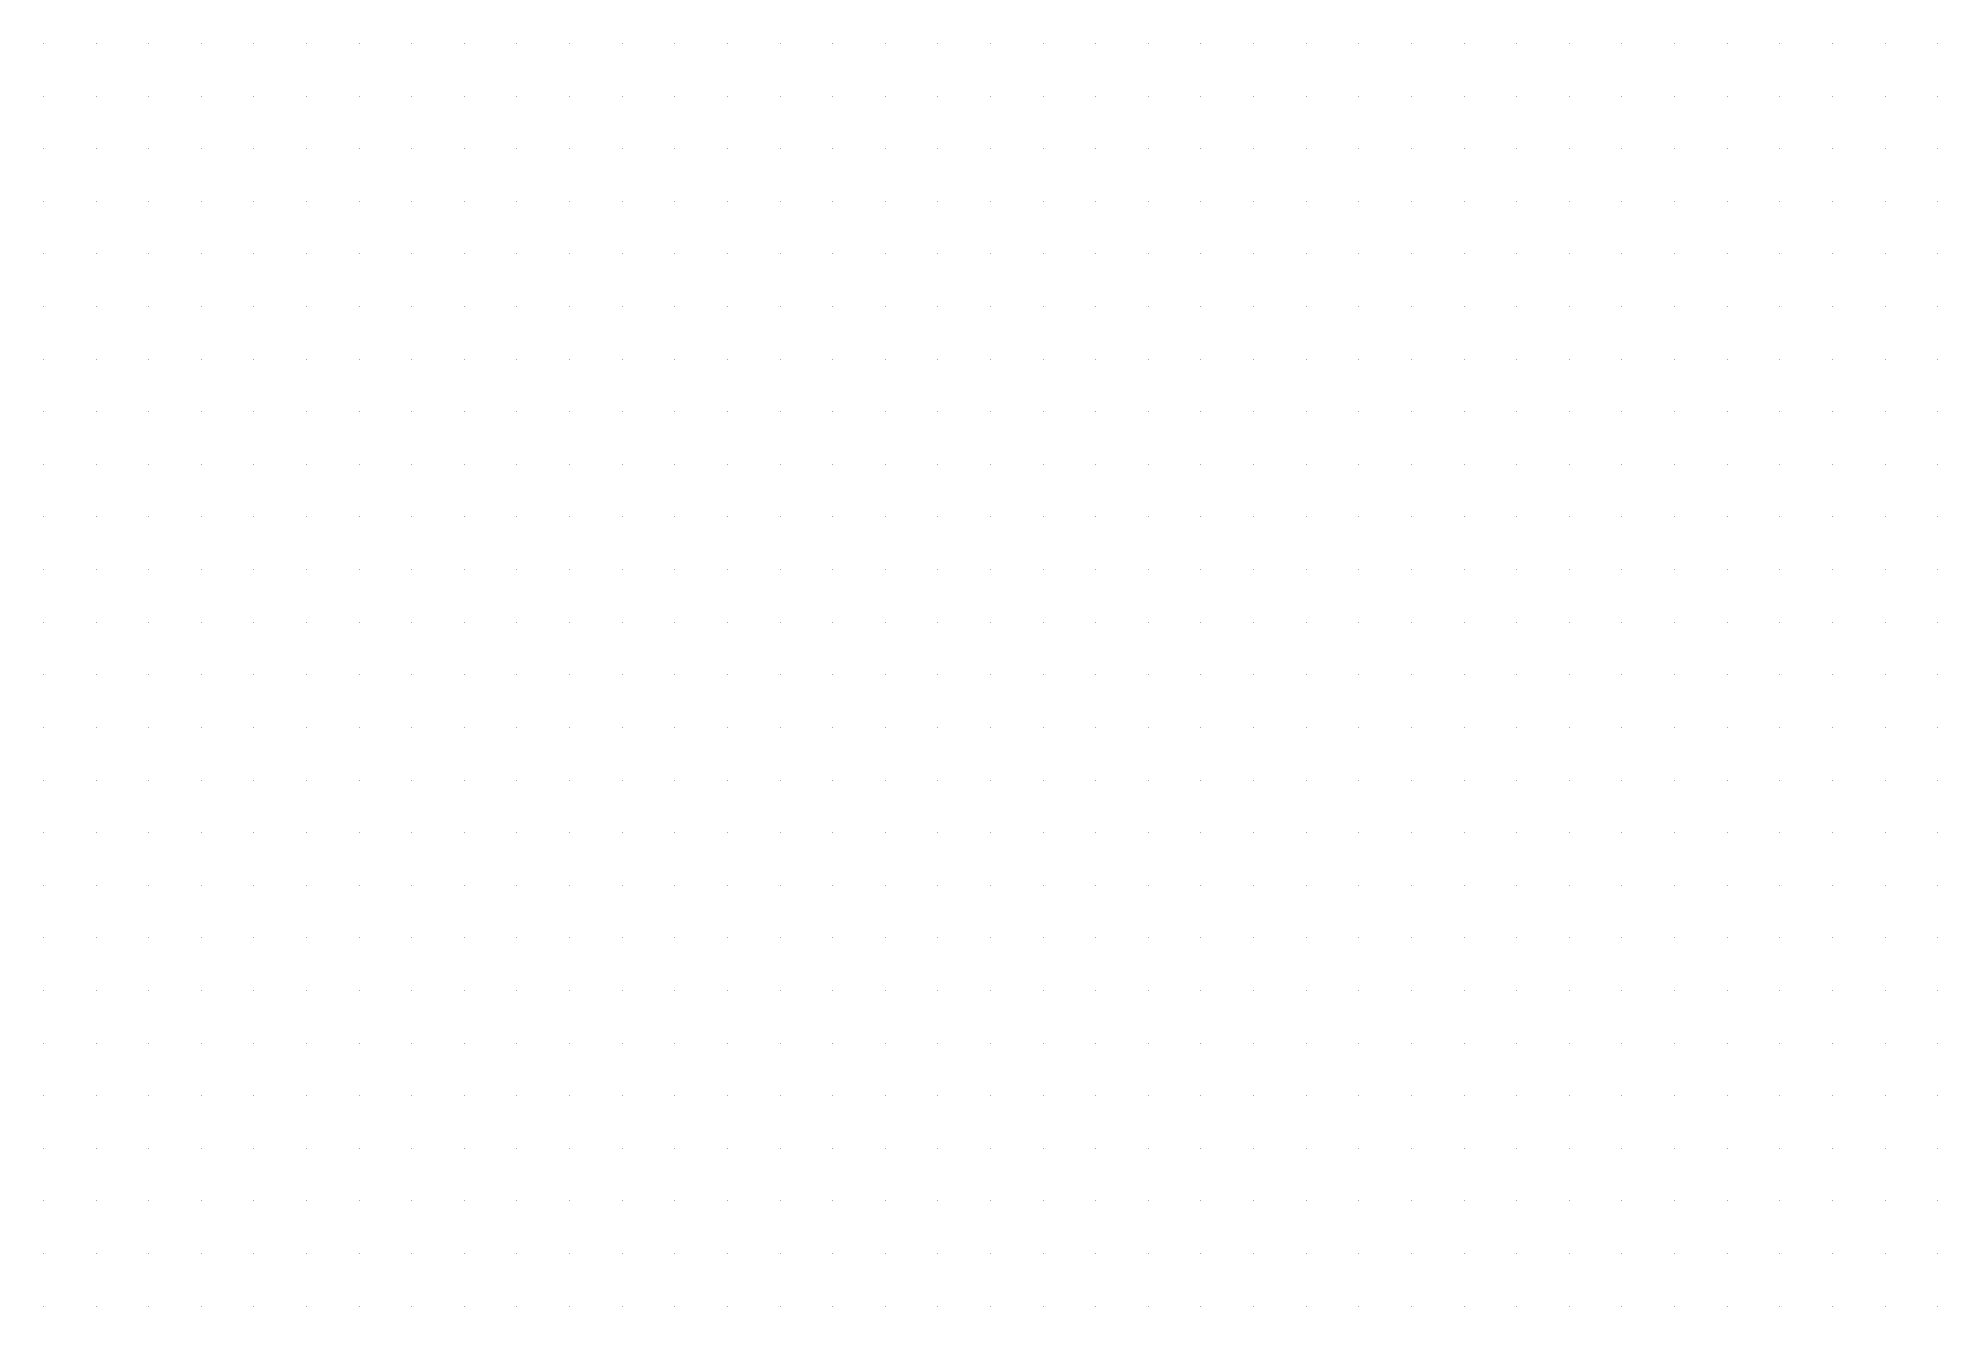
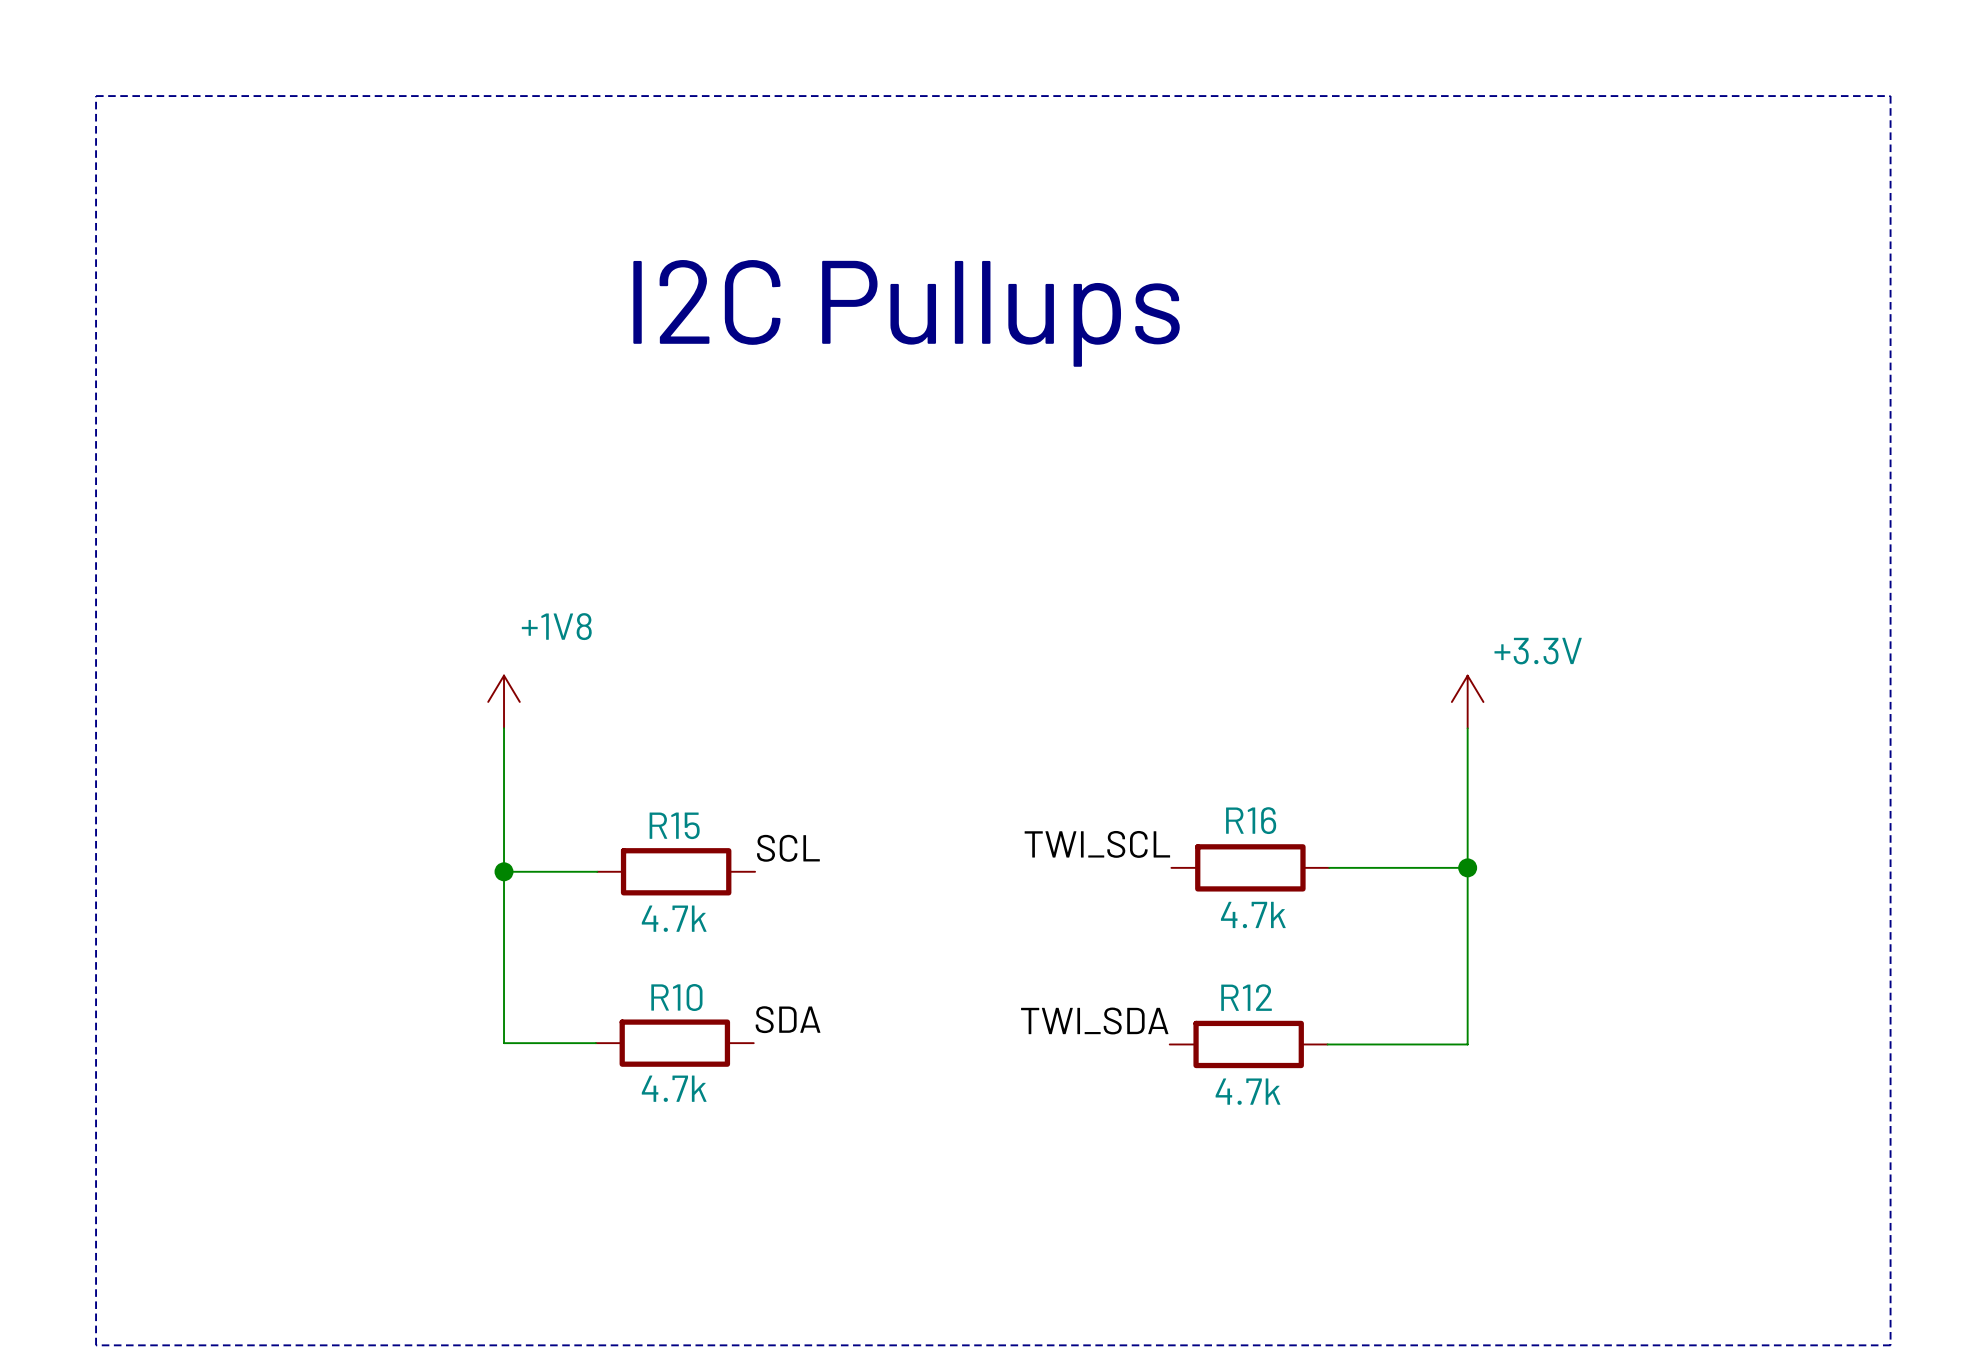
line: none -> (96, 96) (1890, 96) (1890, 1345) (96, 1345) (96, 96)
text: none -> I2C Pullups (906, 313)
power symbol: none -> +1V8 (504, 701)
power symbol: none -> +3.3V (1467, 702)
wire: none -> (504, 728) (504, 1043) (595, 1043)
wire: none -> (1467, 728) (1467, 1044) (1327, 1044)
label: none -> SCL (788, 848)
label: none -> TWI_SCL (1097, 844)
R16: none -> 4.7k (1250, 867)
wire: none -> (1329, 867) (1467, 867)
junction: none -> (1467, 867)
wire: none -> (504, 871) (597, 871)
junction: none -> (504, 871)
R15: none -> 4.7k (676, 871)
label: none -> SDA (788, 1019)
label: none -> TWI_SDA (1094, 1020)
R10: none -> 4.7k (674, 1043)
R12: none -> 4.7k (1248, 1044)

